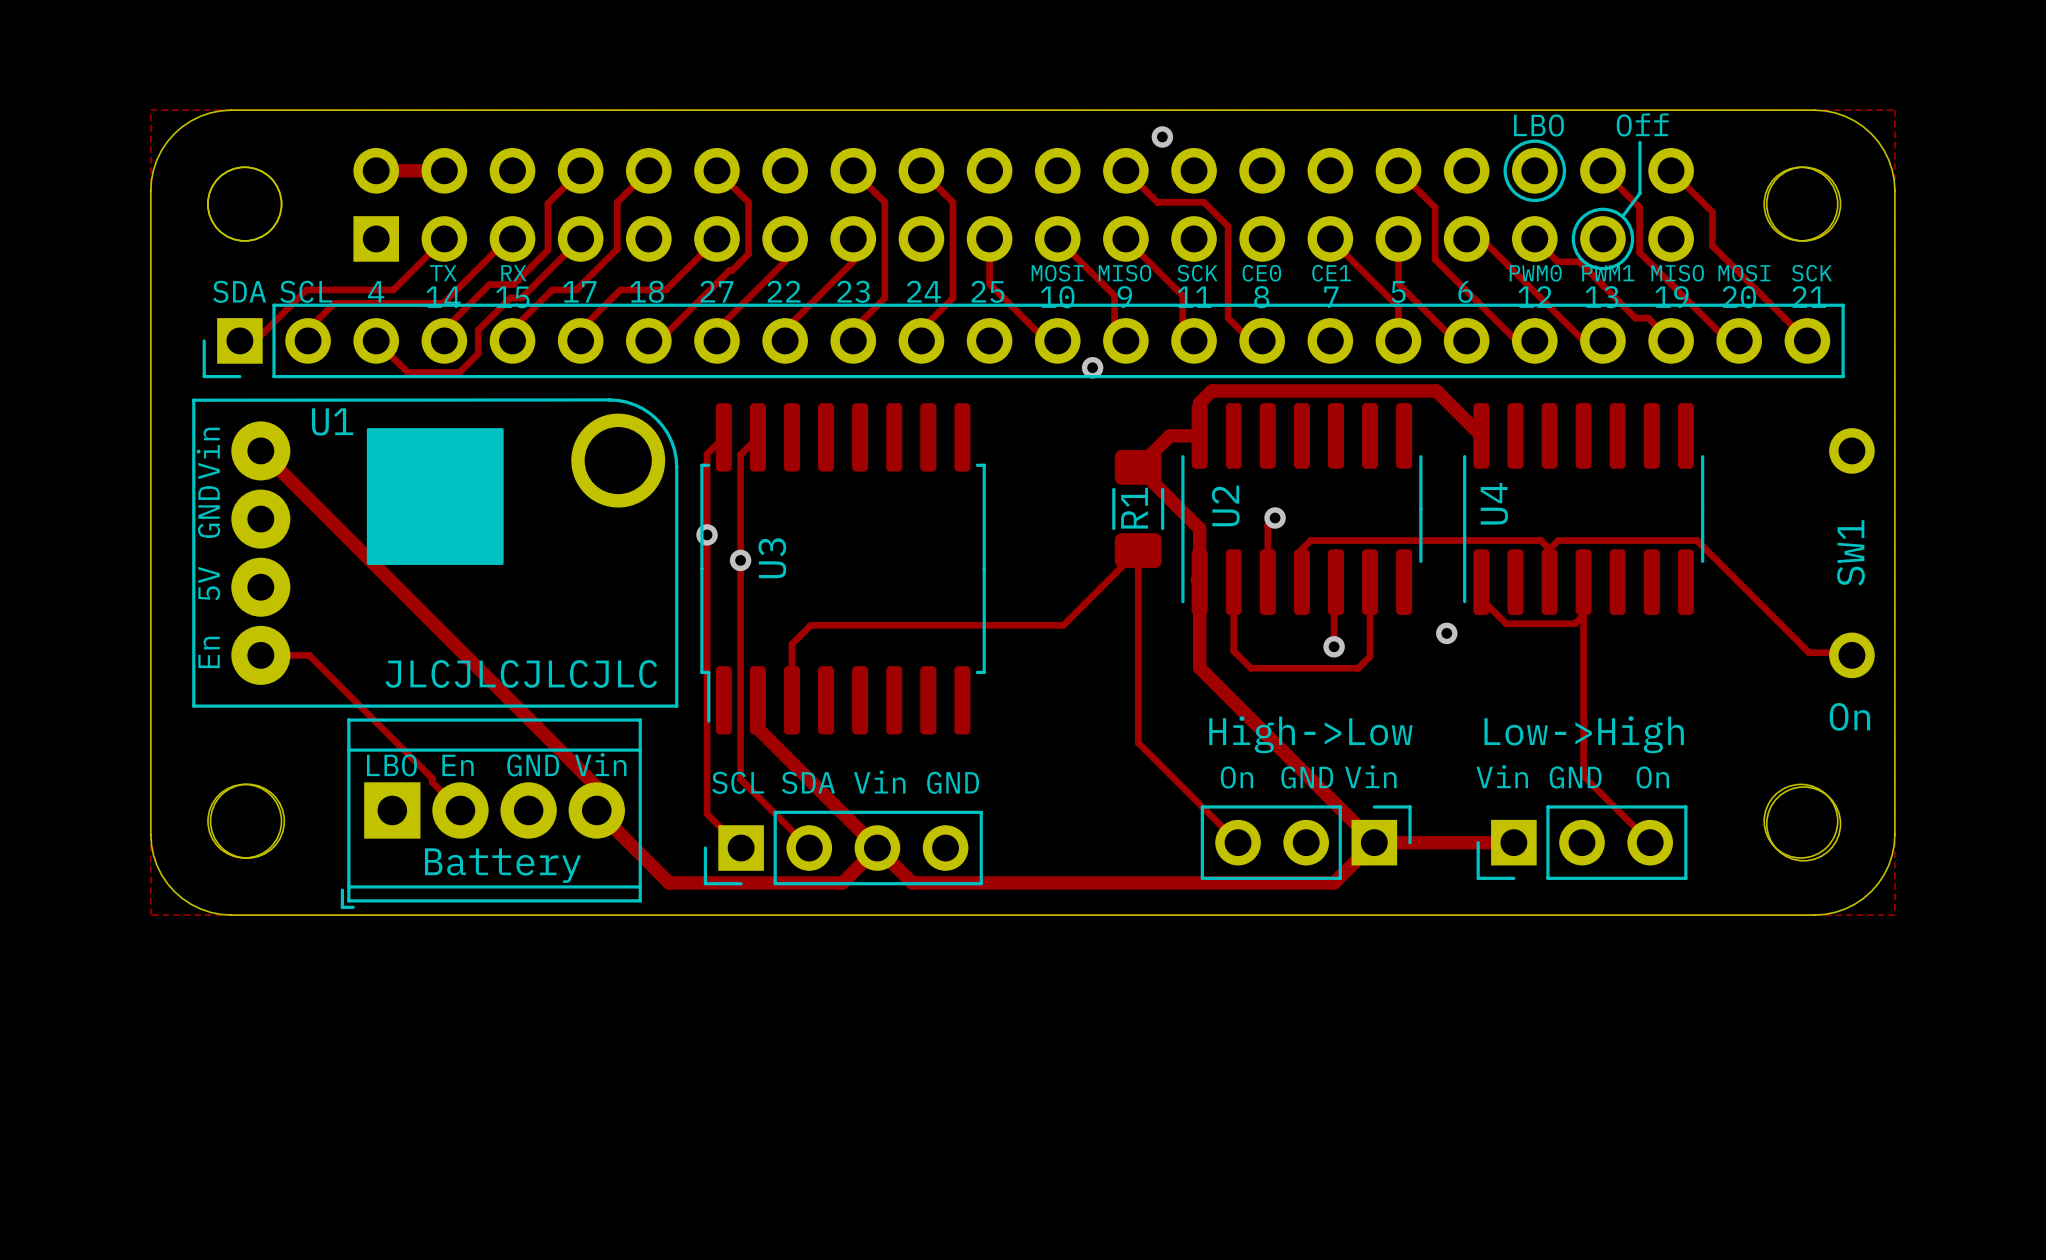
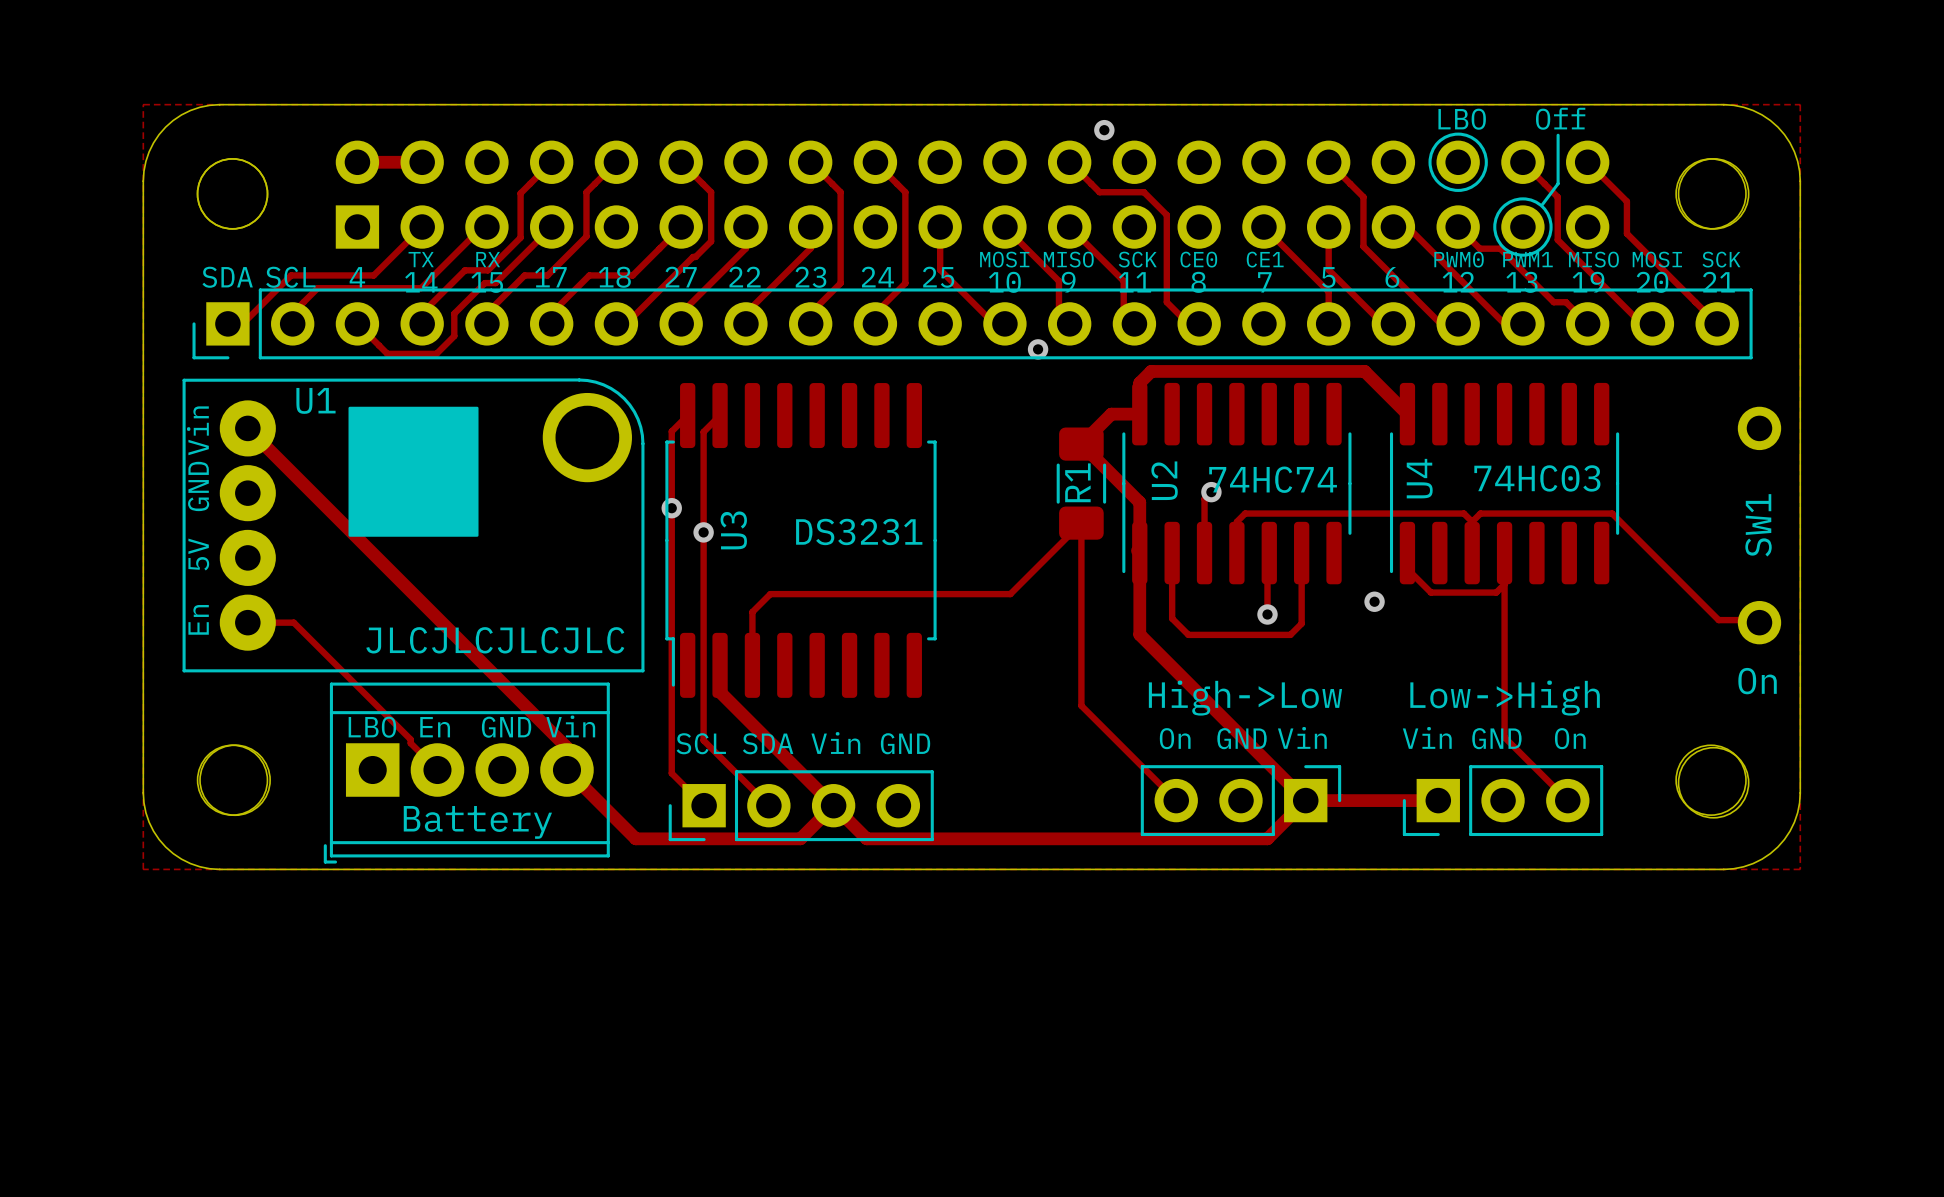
text: none -> 74HC03 (1537, 478)
text: none -> 74HC74 (1273, 479)
text: none -> DS3231 (859, 531)

